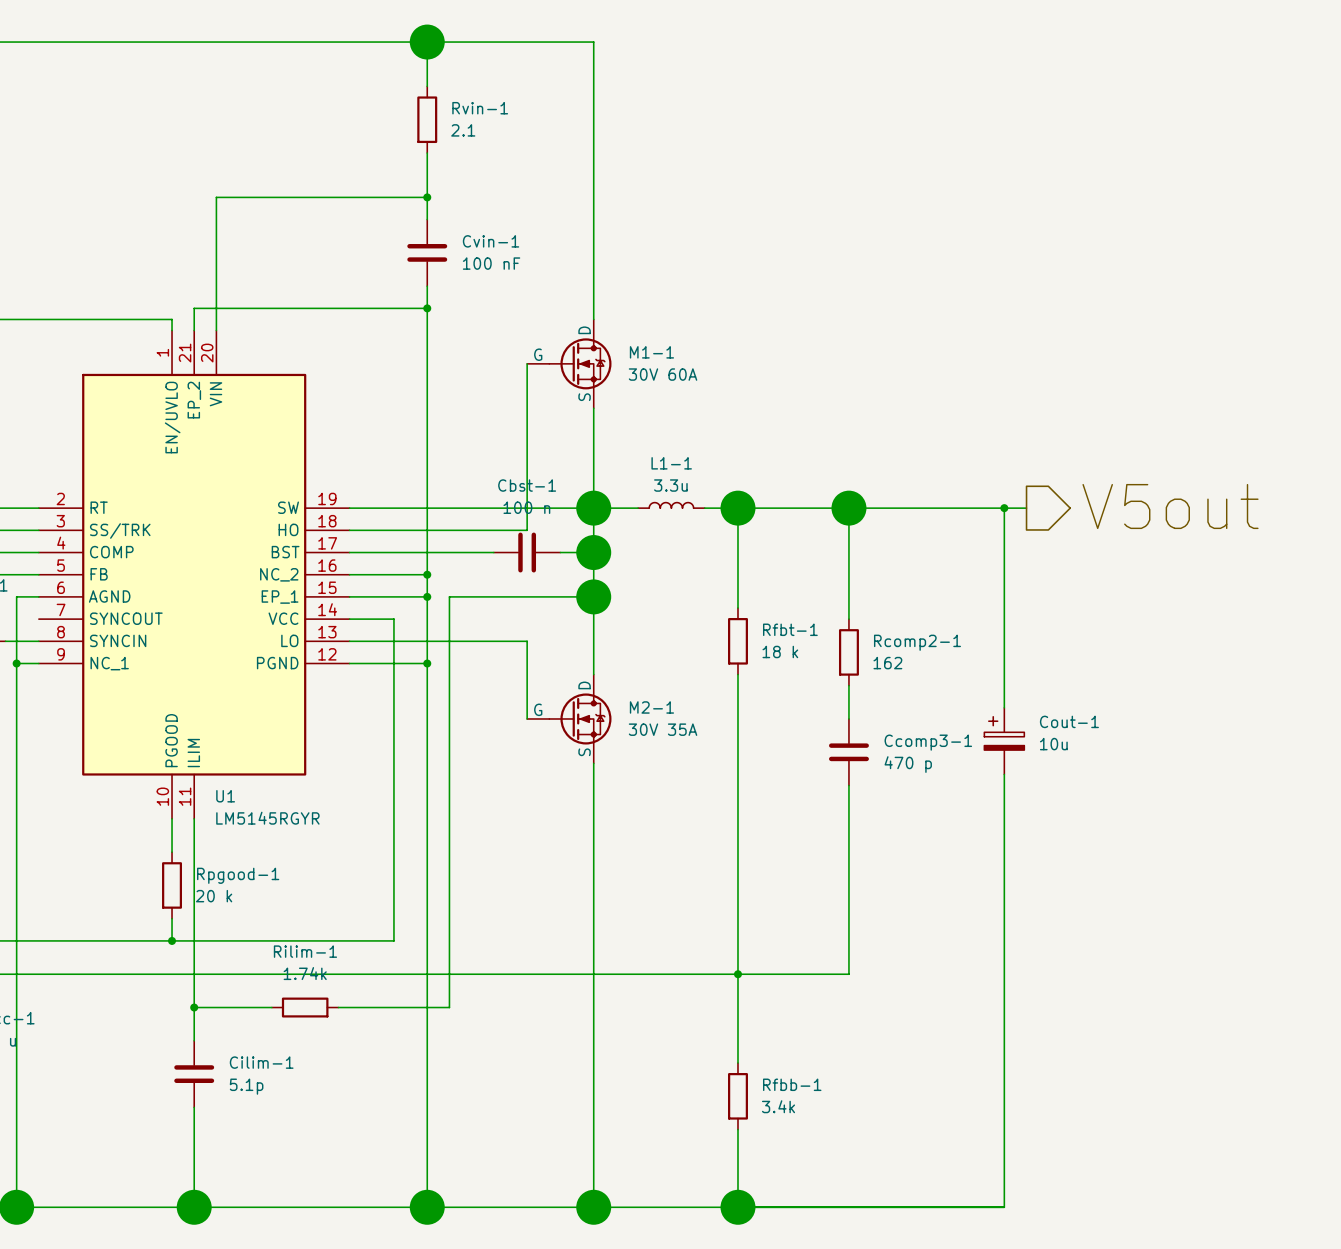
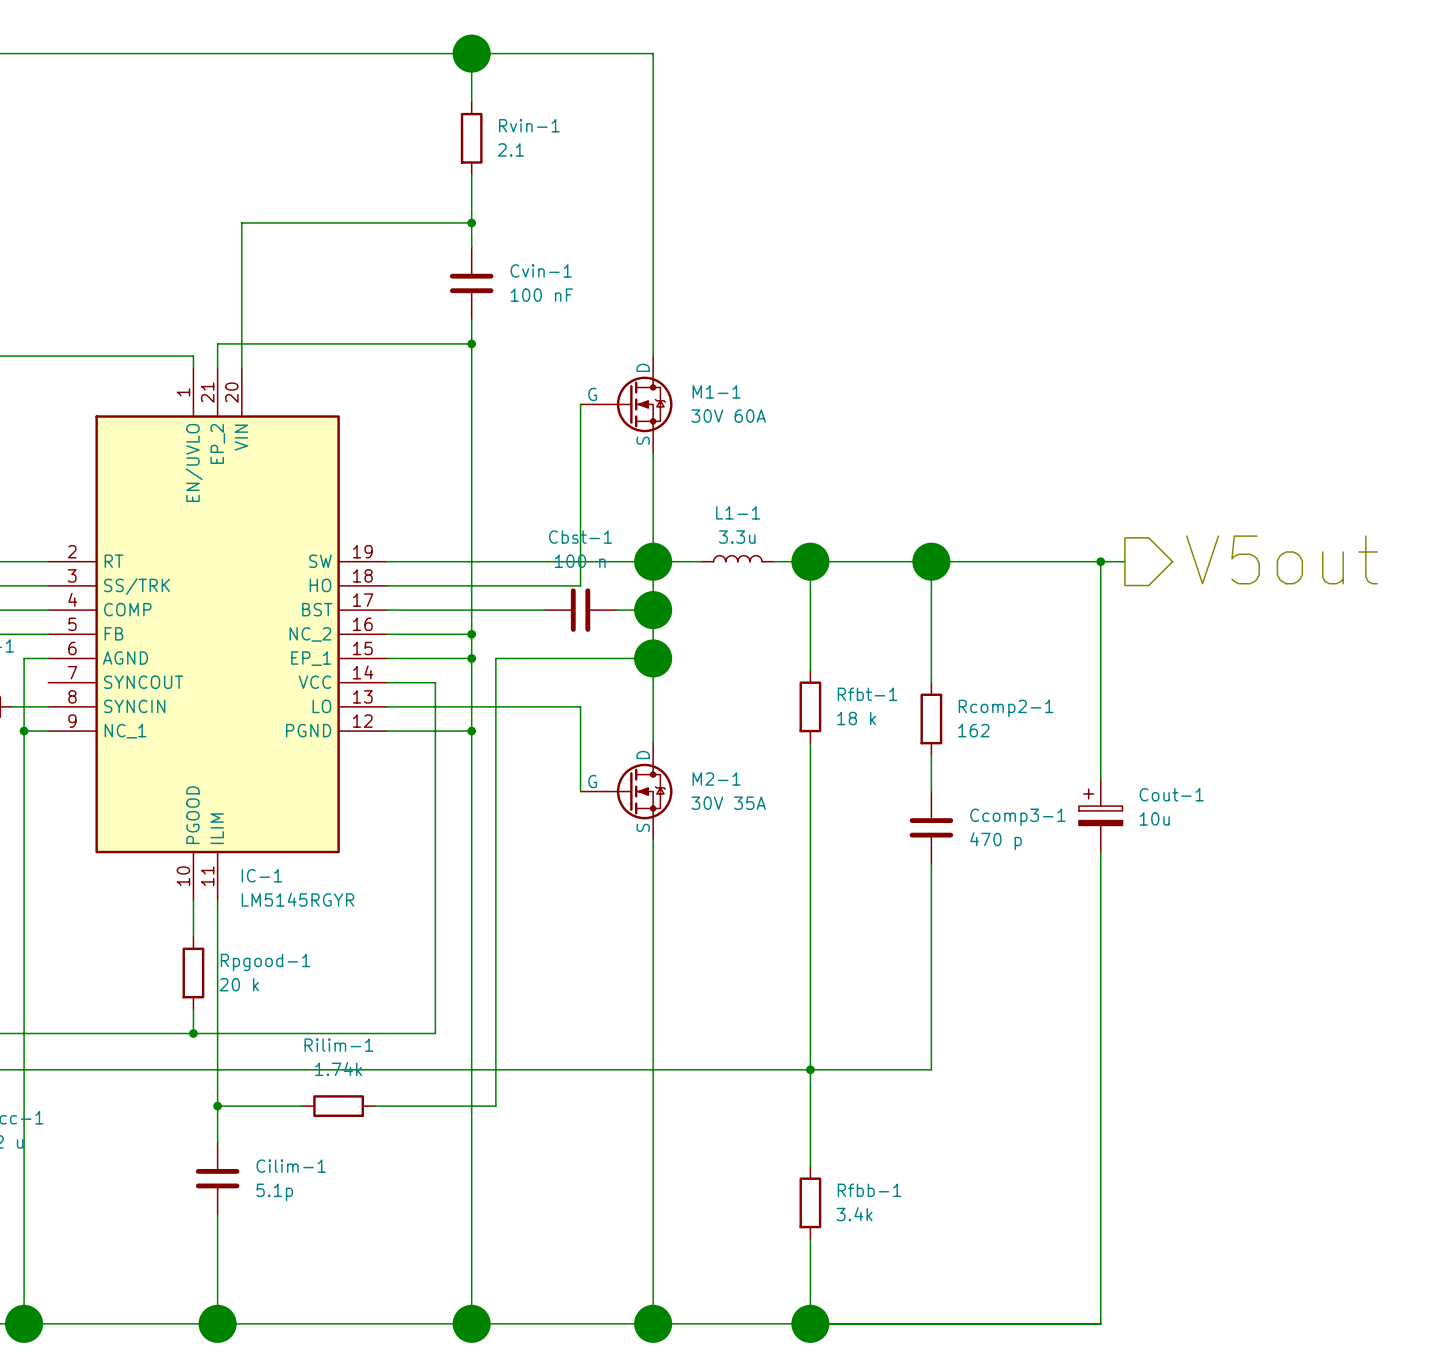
U1 name: U1 (225, 796) -> IC-1 (261, 875)

